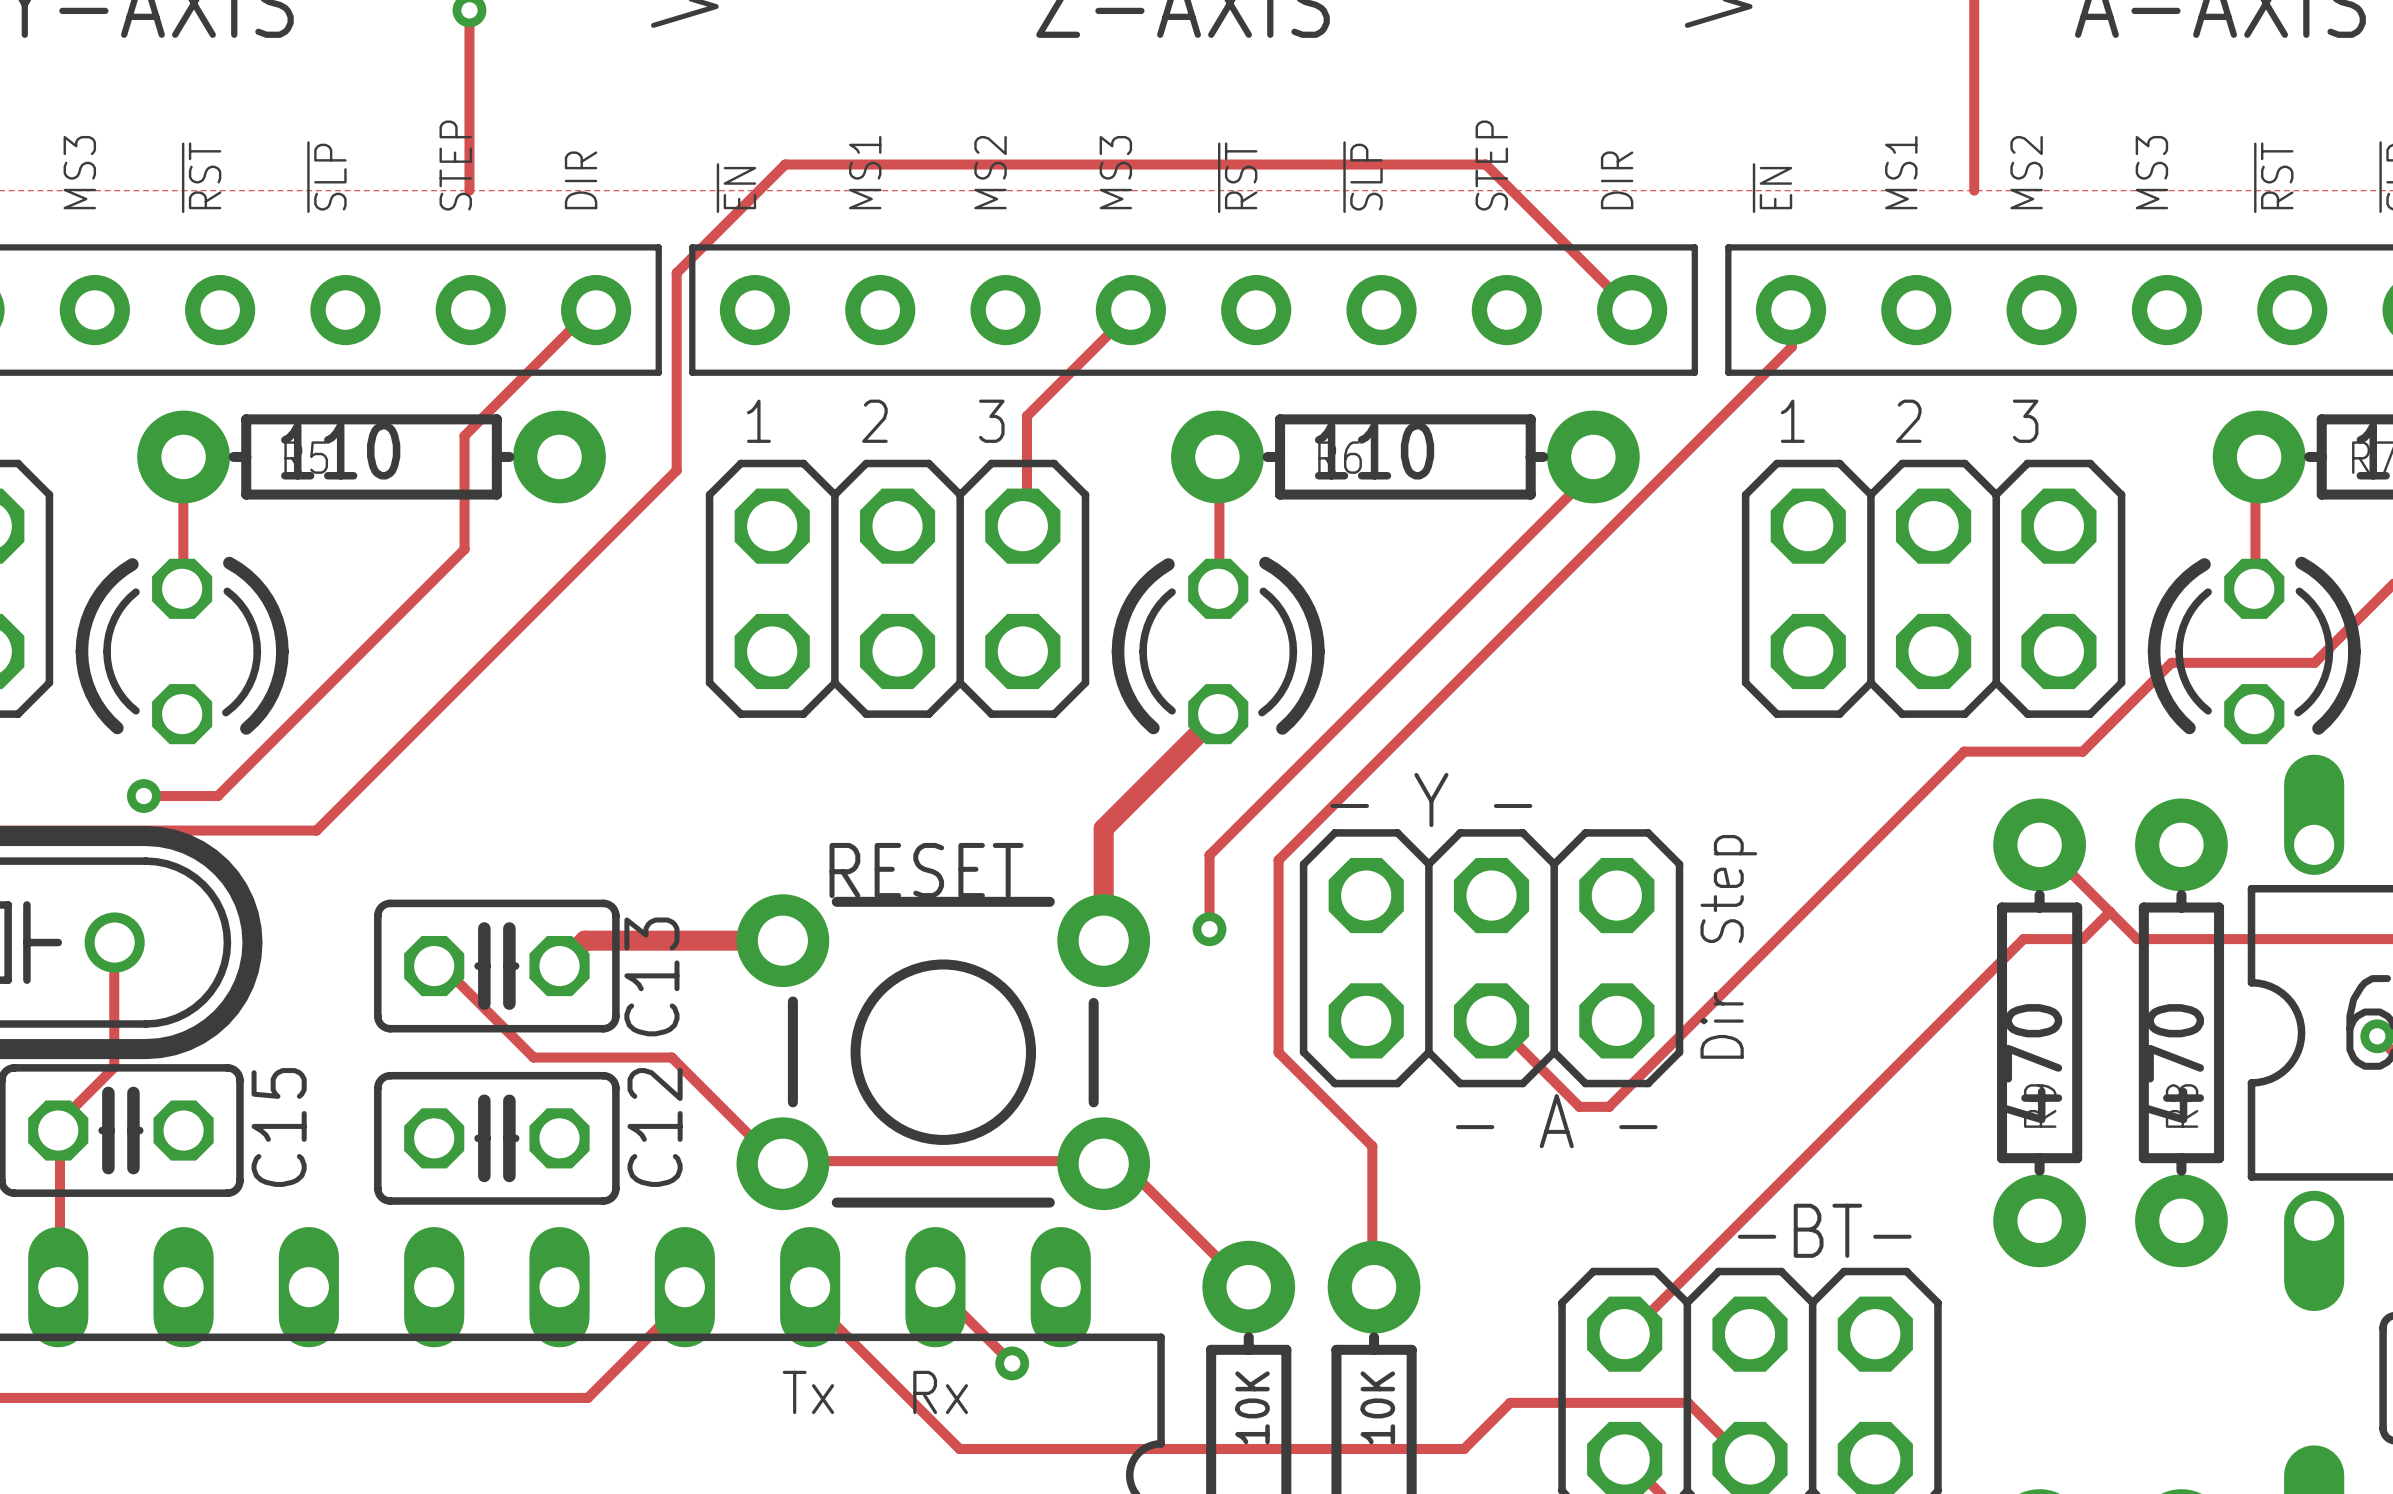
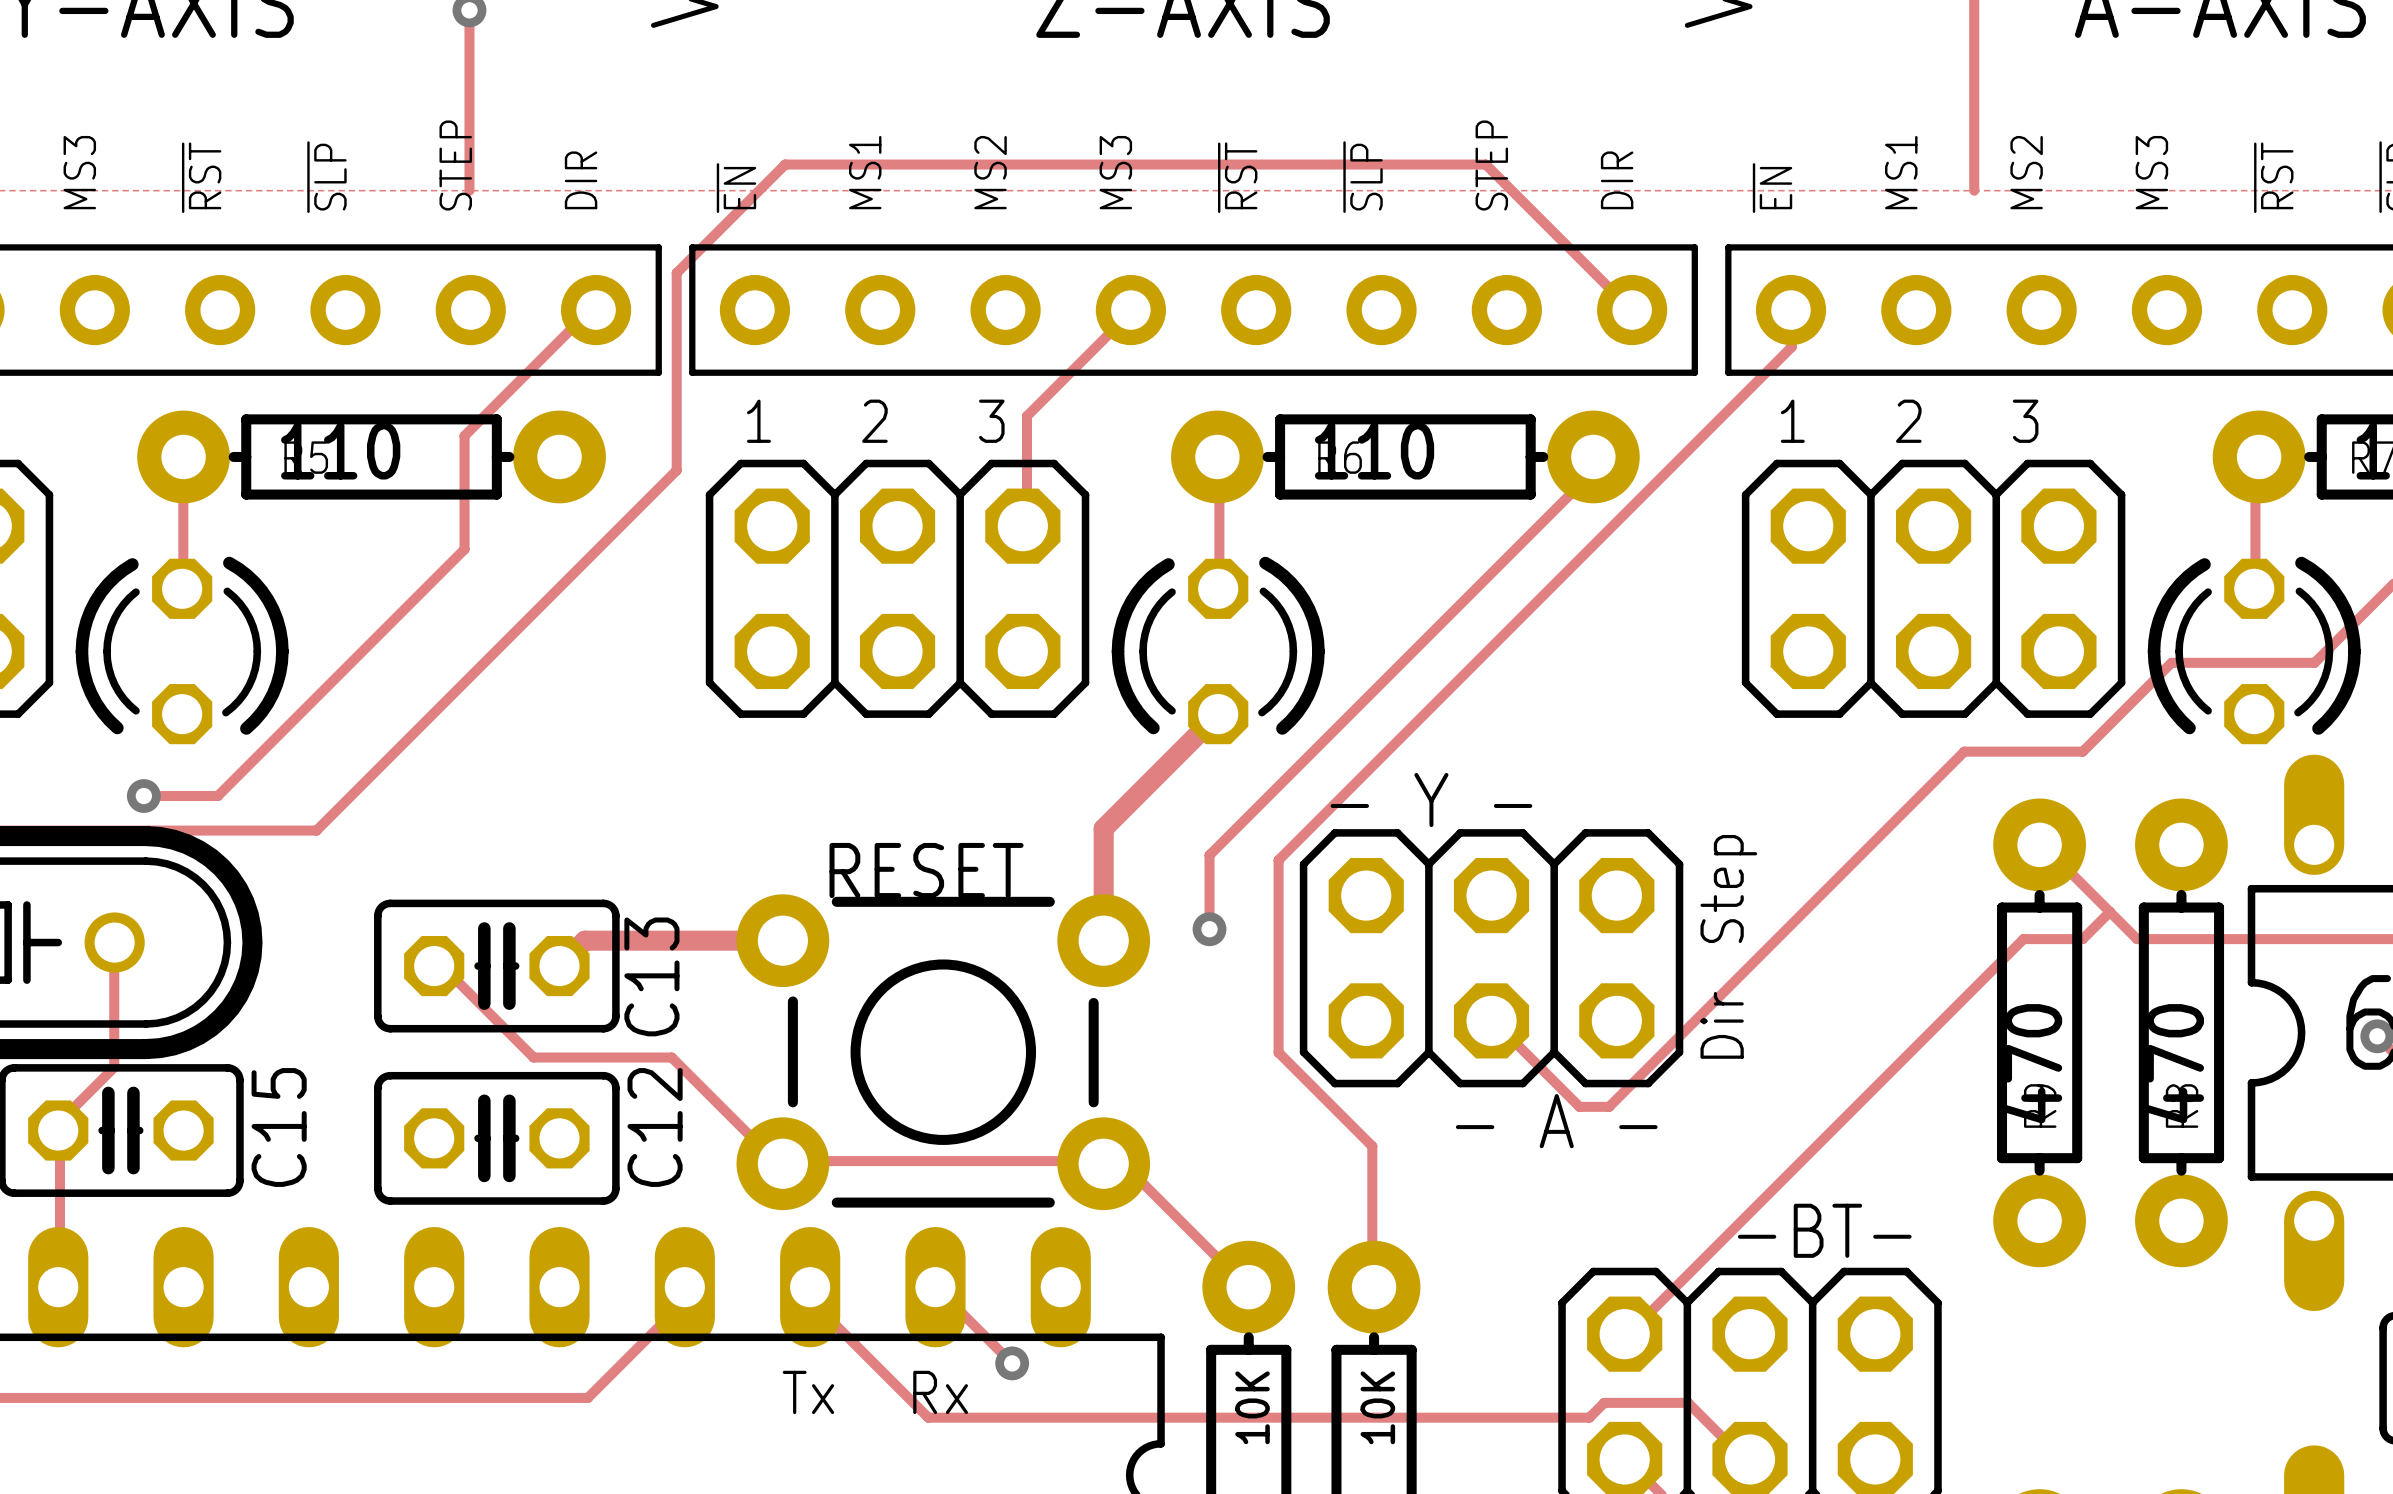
track: (1604, 1402) (1510, 1402) (1464, 1448) (959, 1448) (928, 1417) -> (1604, 1402) (1589, 1417) (928, 1417)

